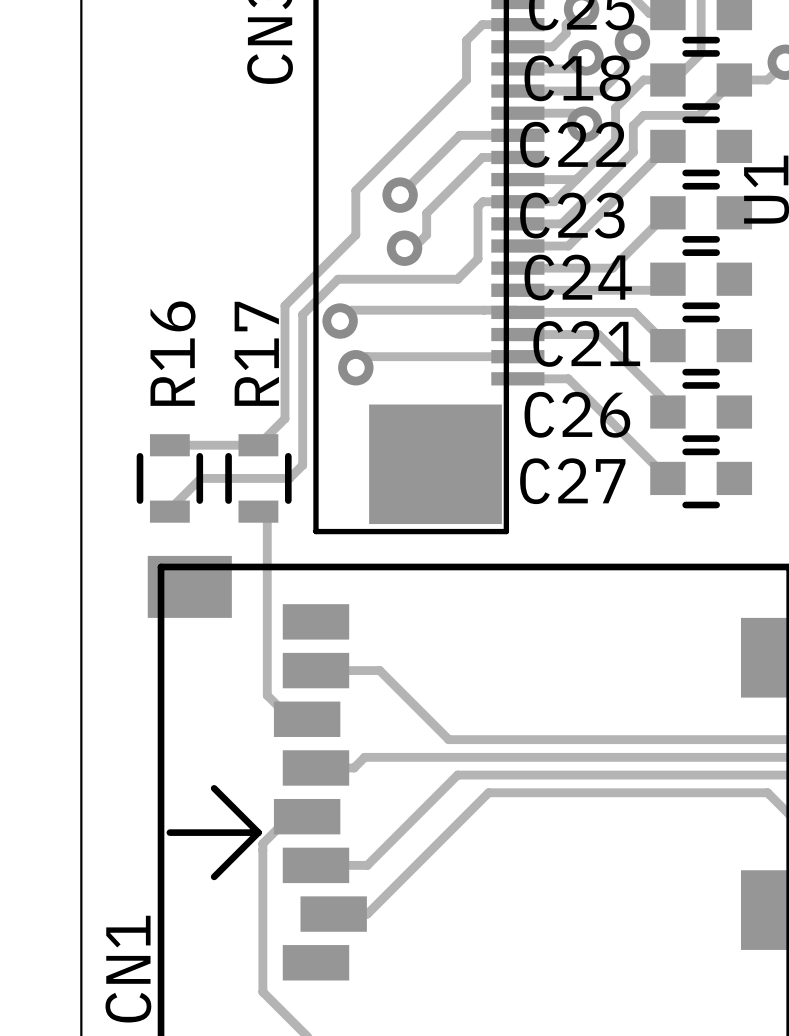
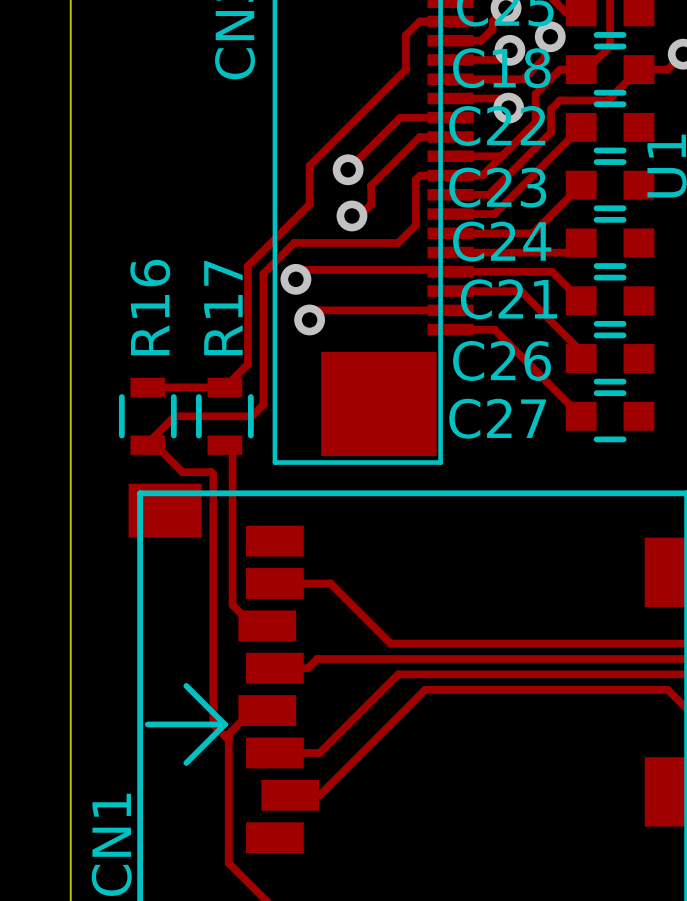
track: none -> (147, 445) (155, 445) (182, 472) (210, 472) (213, 474) (213, 724) (228, 739)

